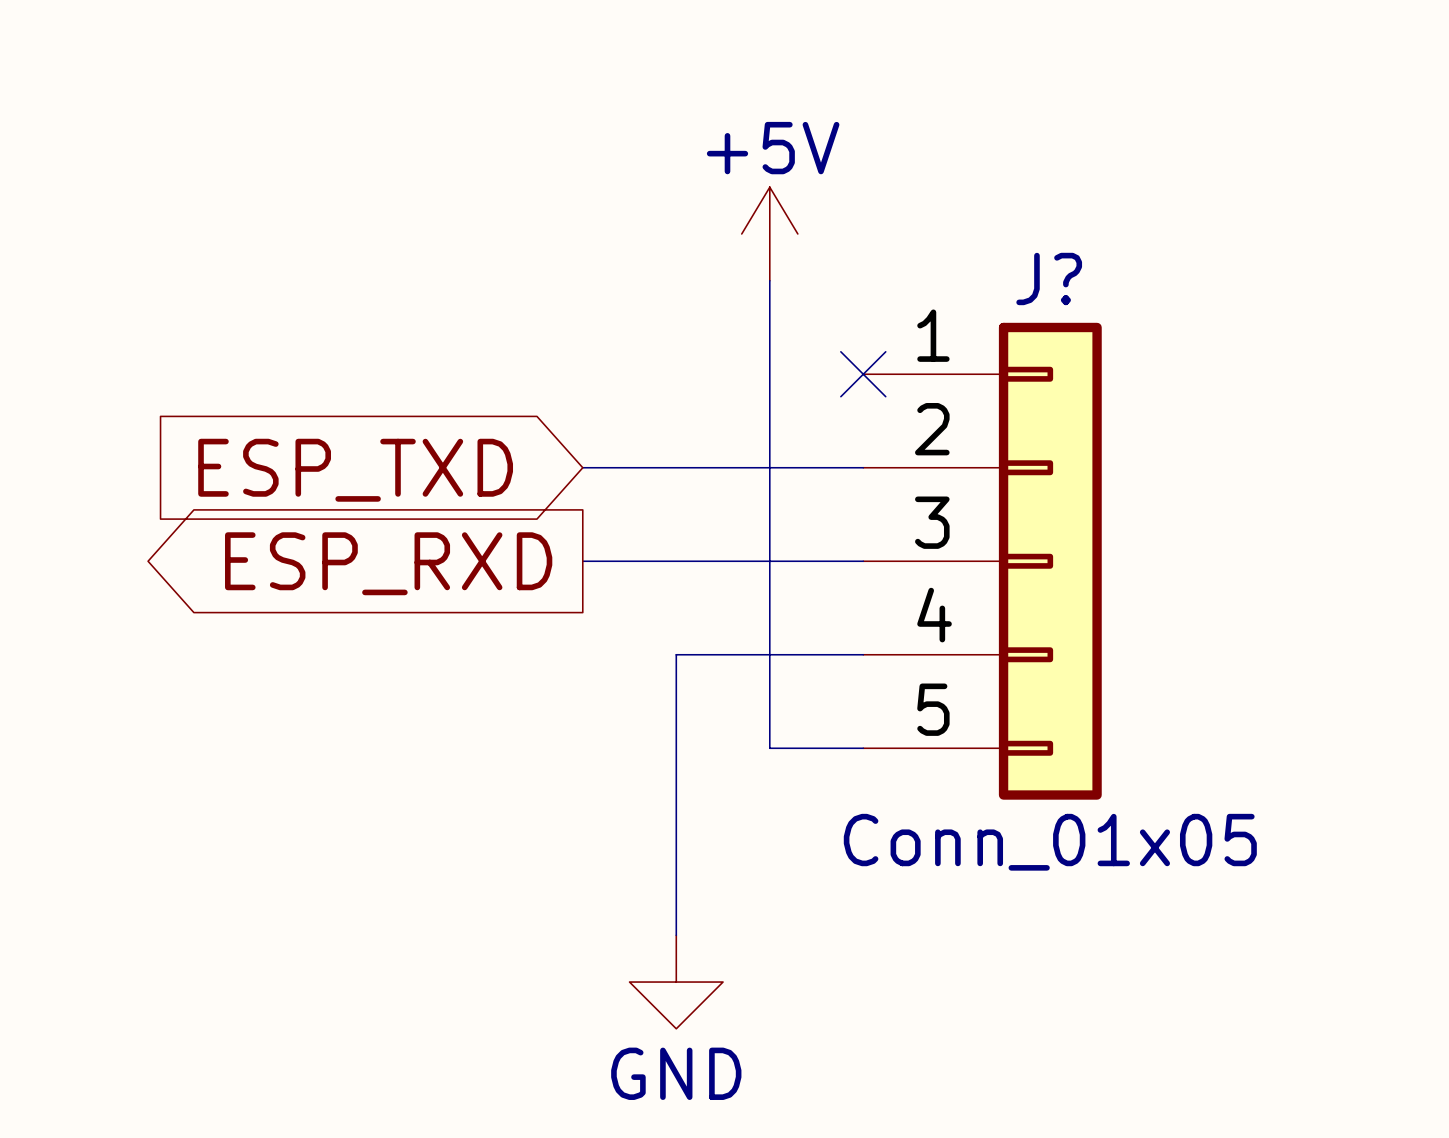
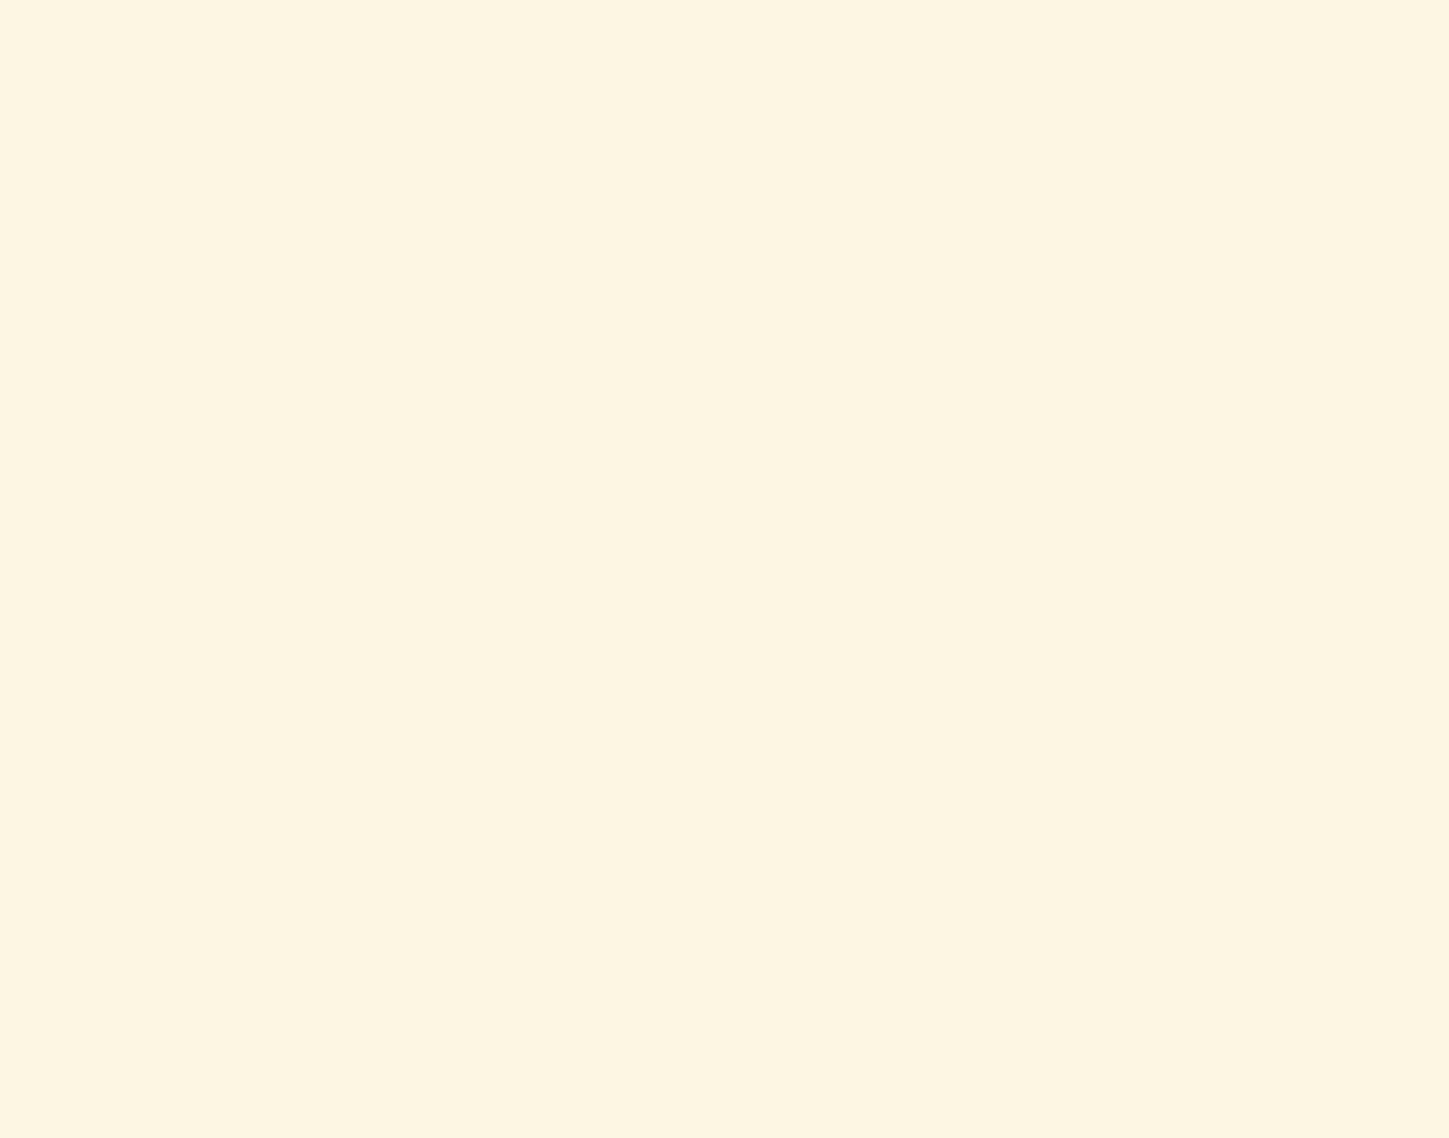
power symbol: +5V (769, 233) -> none
wire: (769, 280) (769, 748) (863, 748) -> none
no-connect mark: (863, 374) -> none
wire: (582, 467) (863, 467) -> none
global label: ESP_TXD (355, 470) -> none
wire: (582, 561) (863, 561) -> none
J?: Conn_01x05 (982, 561) -> none
global label: ESP_RXD (388, 563) -> none
wire: (863, 654) (676, 654) (676, 935) -> none
power symbol: GND (676, 982) -> none

